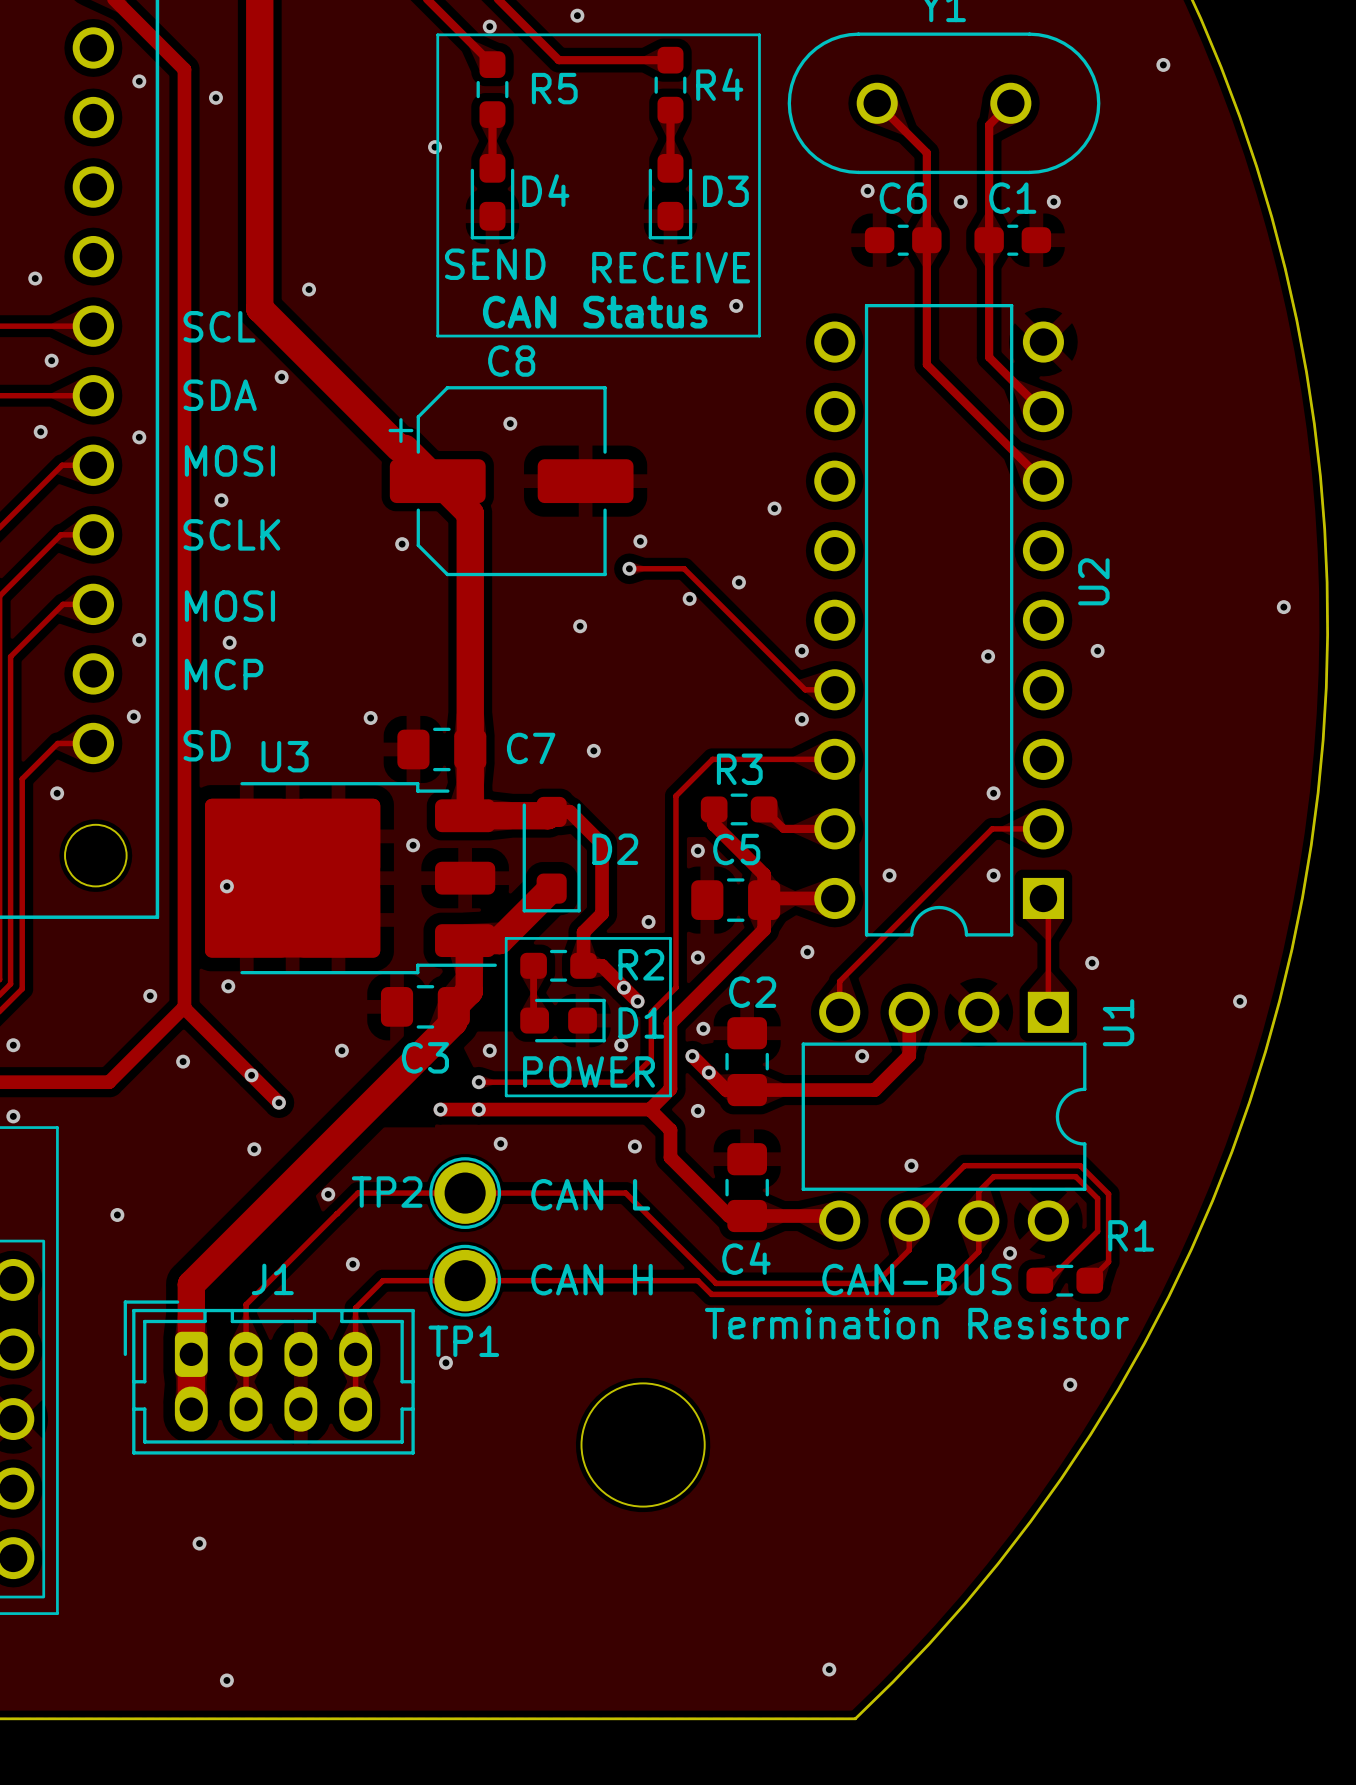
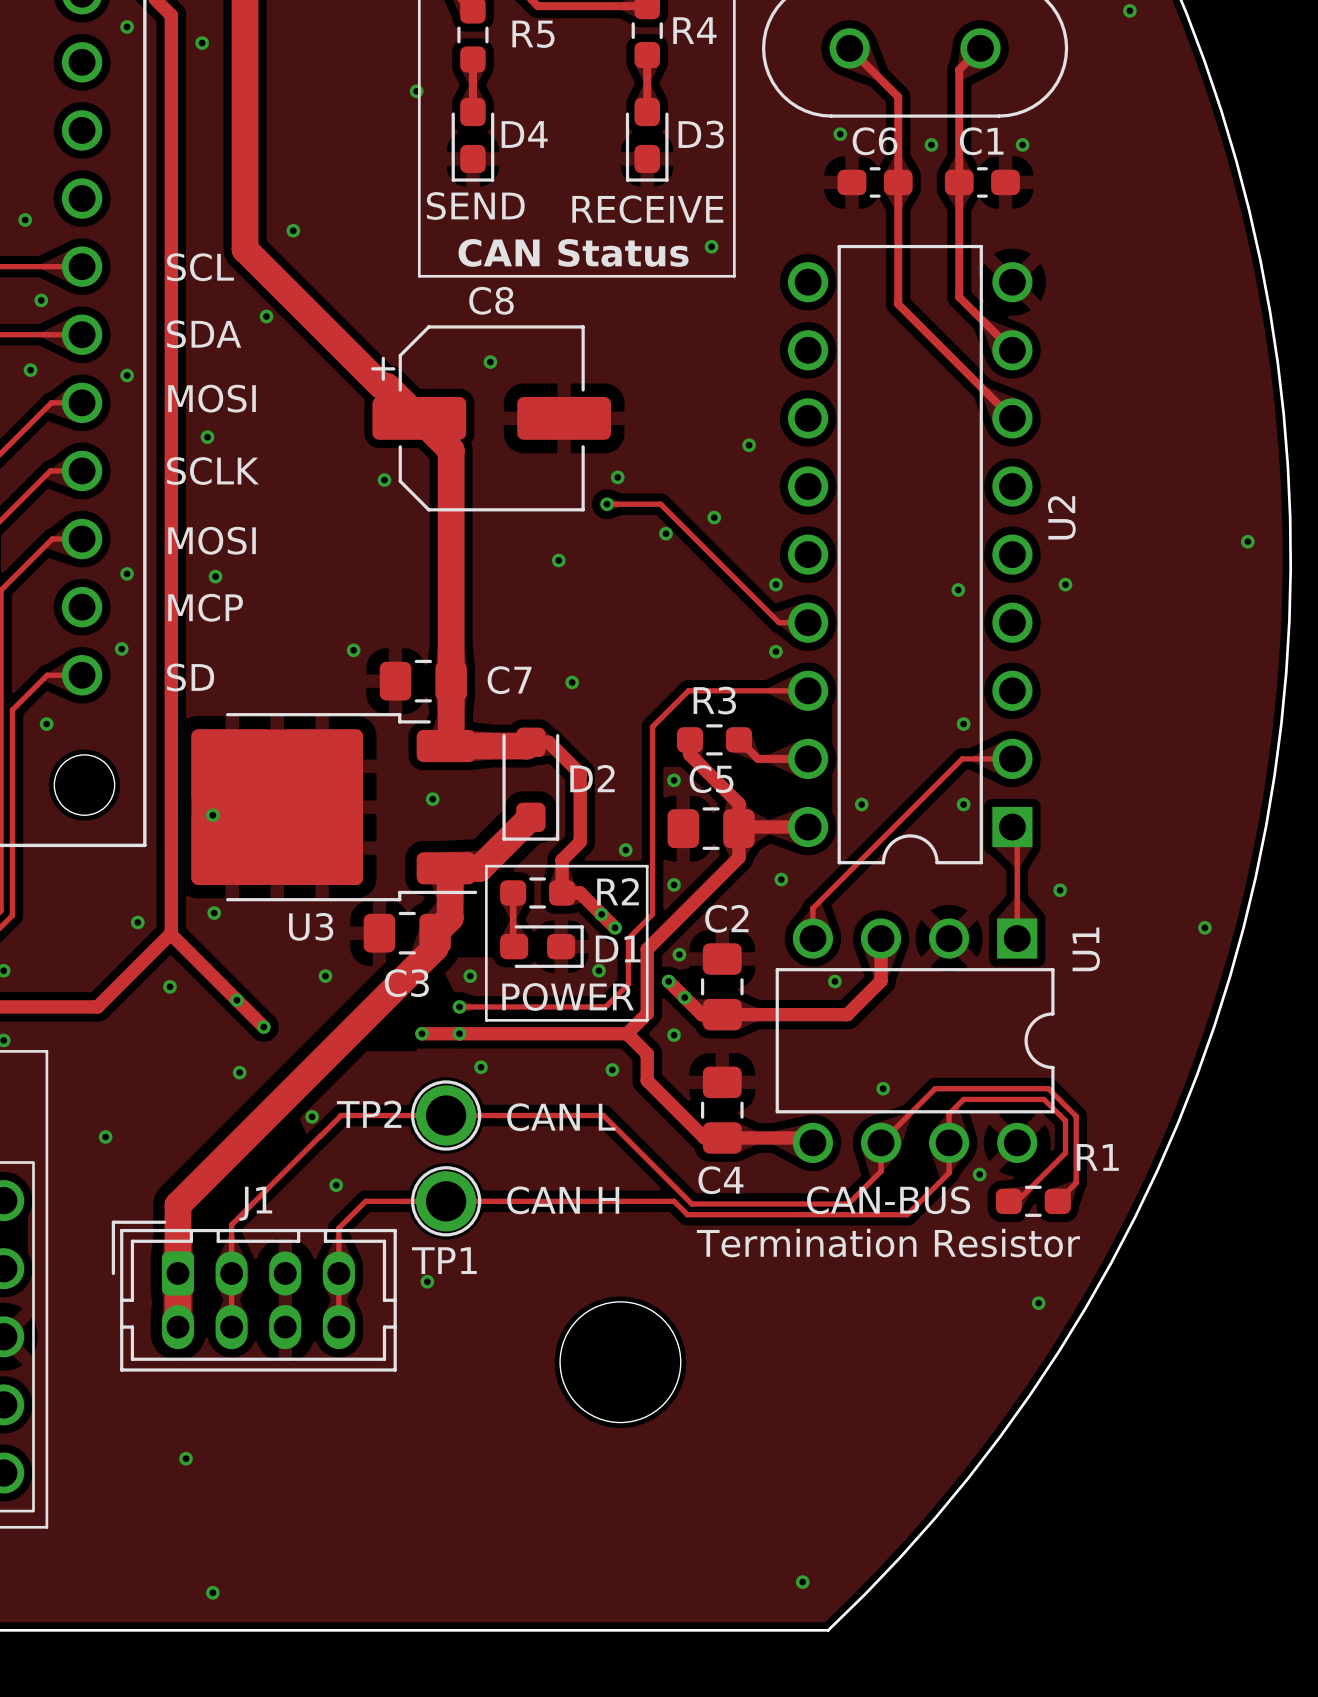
U3 name position: U3 (285, 756) -> U3 (311, 926)
U3 footprint: [205, 782, 497, 975] -> [191, 713, 478, 902]
via position: (413, 845) -> (432, 799)

